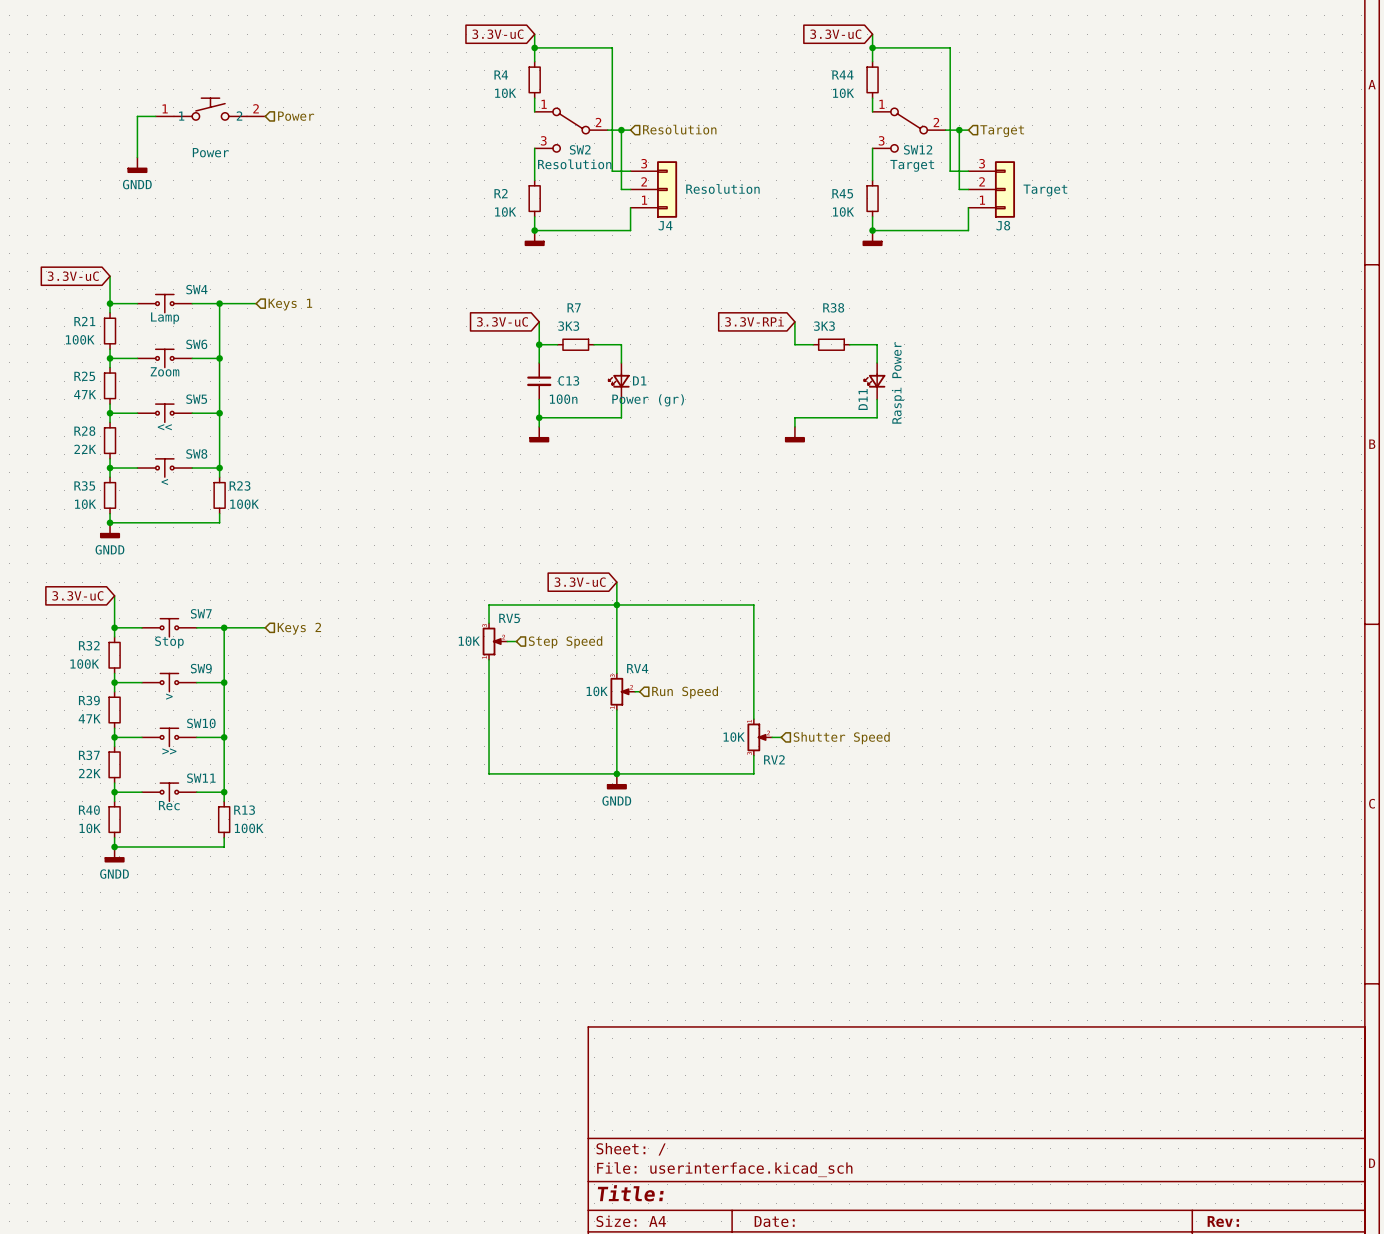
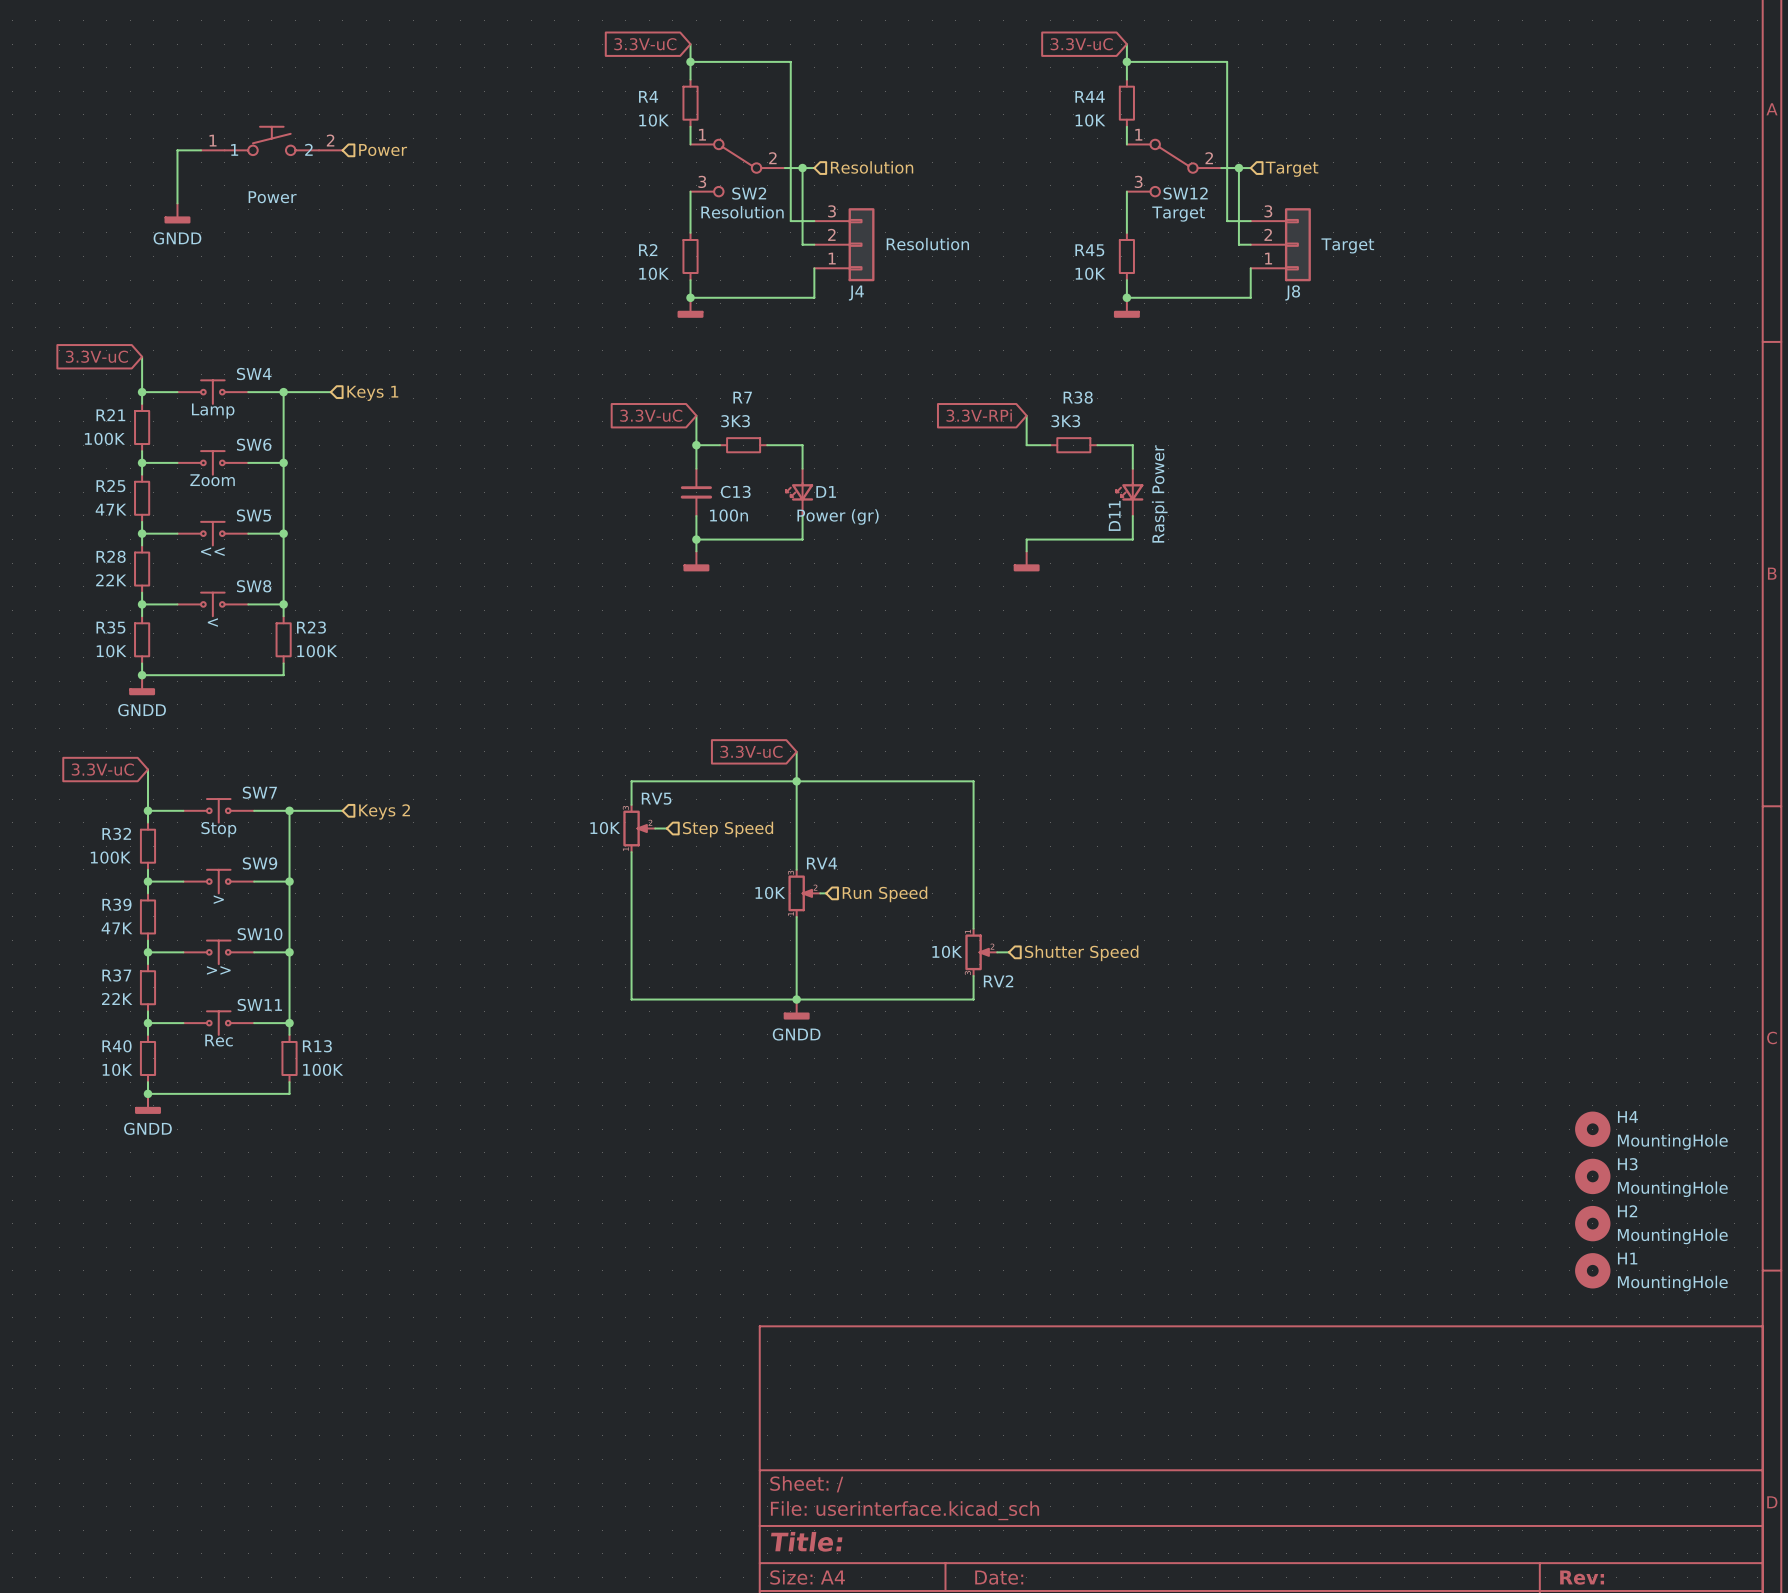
H4: none -> MountingHole (1592, 1129)
H3: none -> MountingHole (1592, 1176)
H2: none -> MountingHole (1592, 1223)
H1: none -> MountingHole (1592, 1270)

